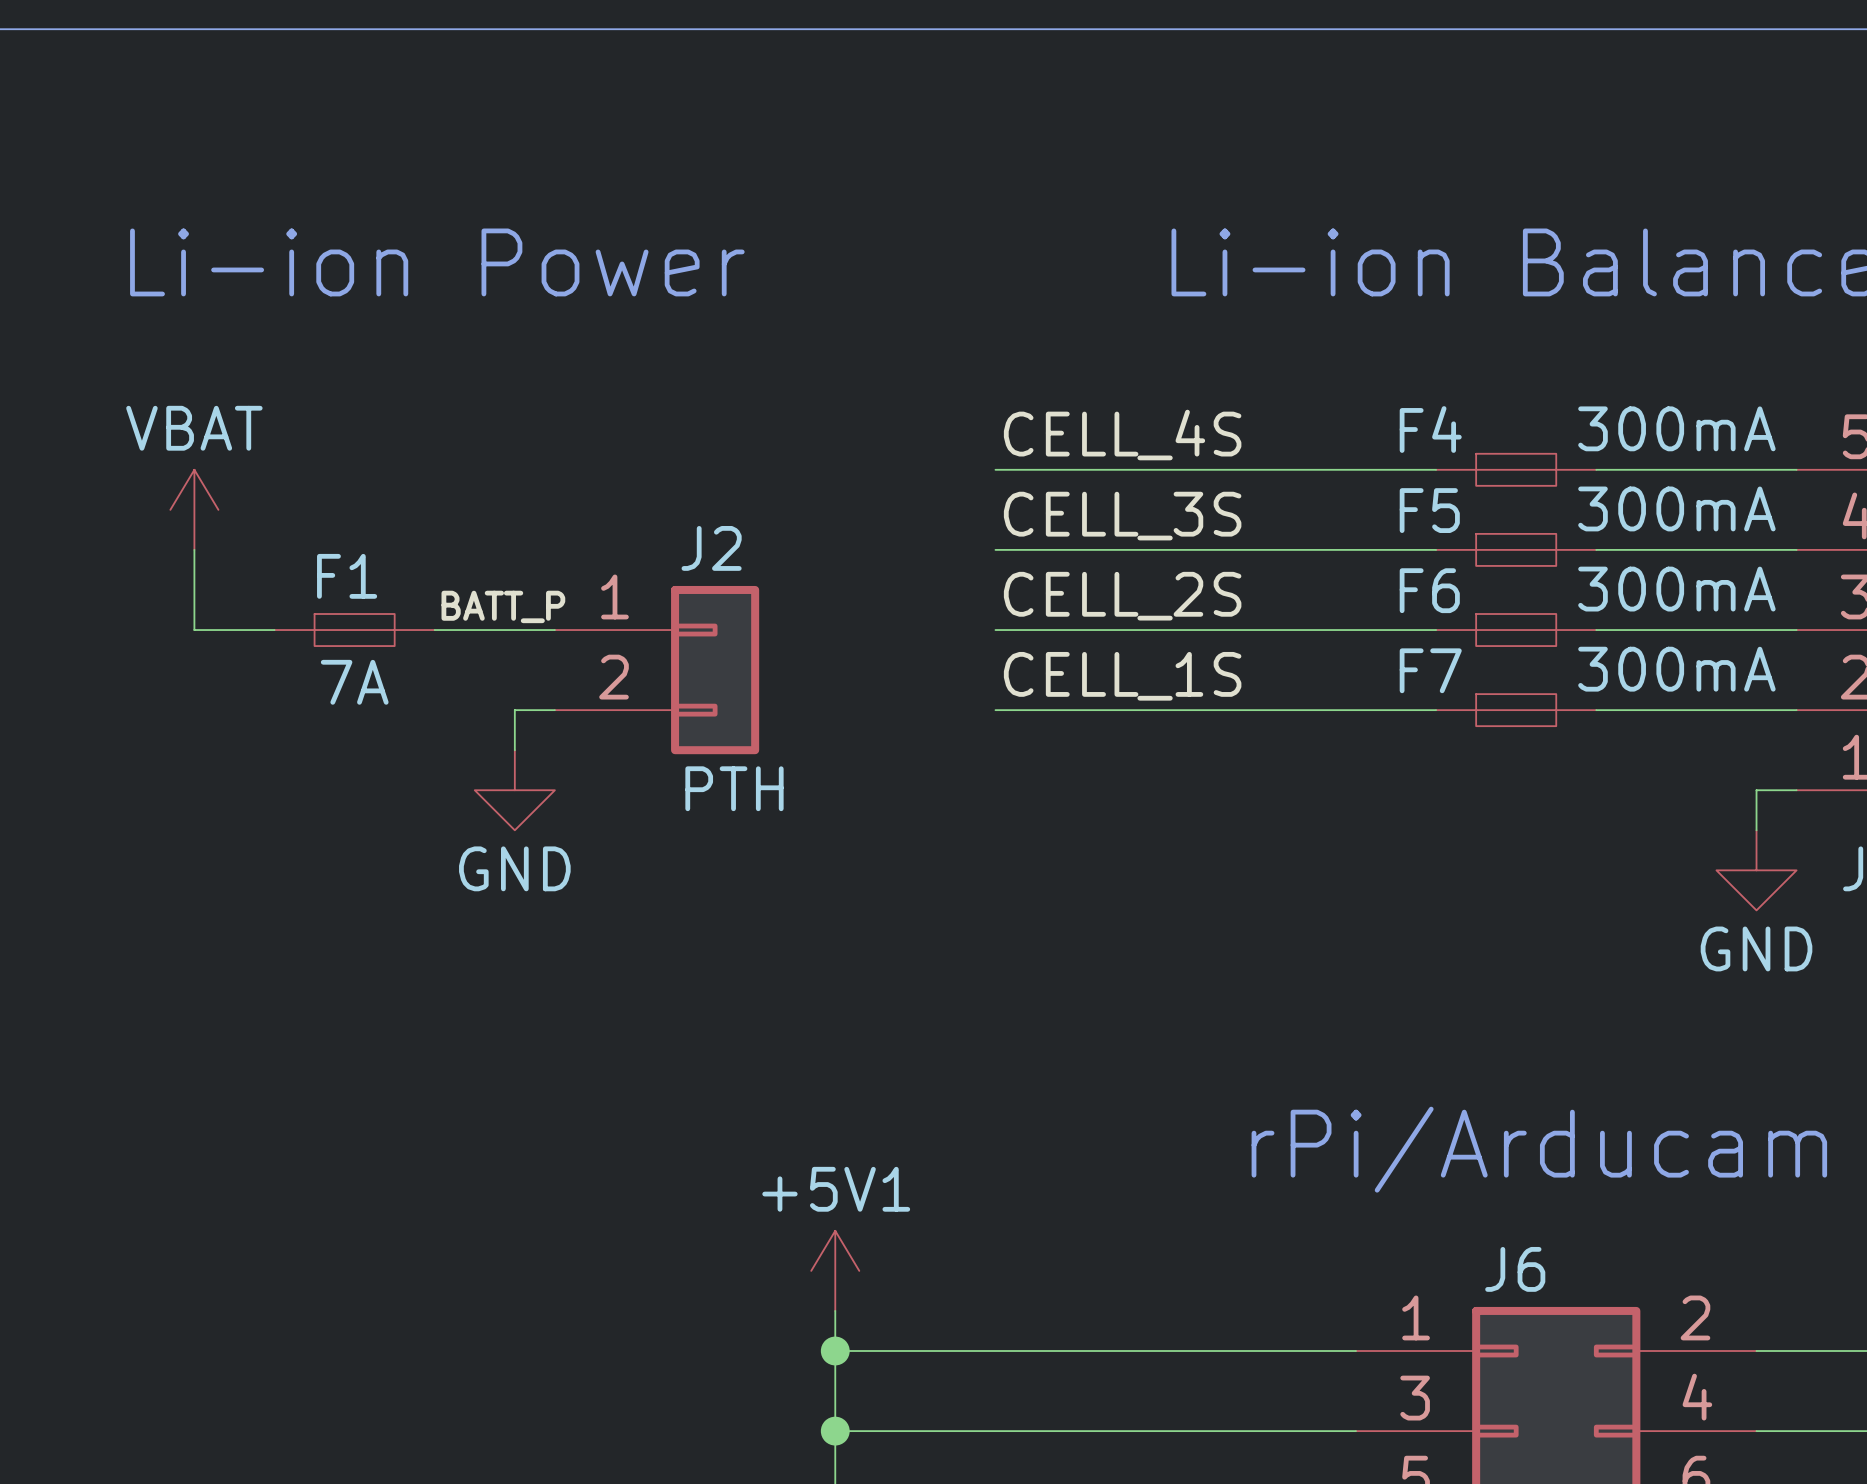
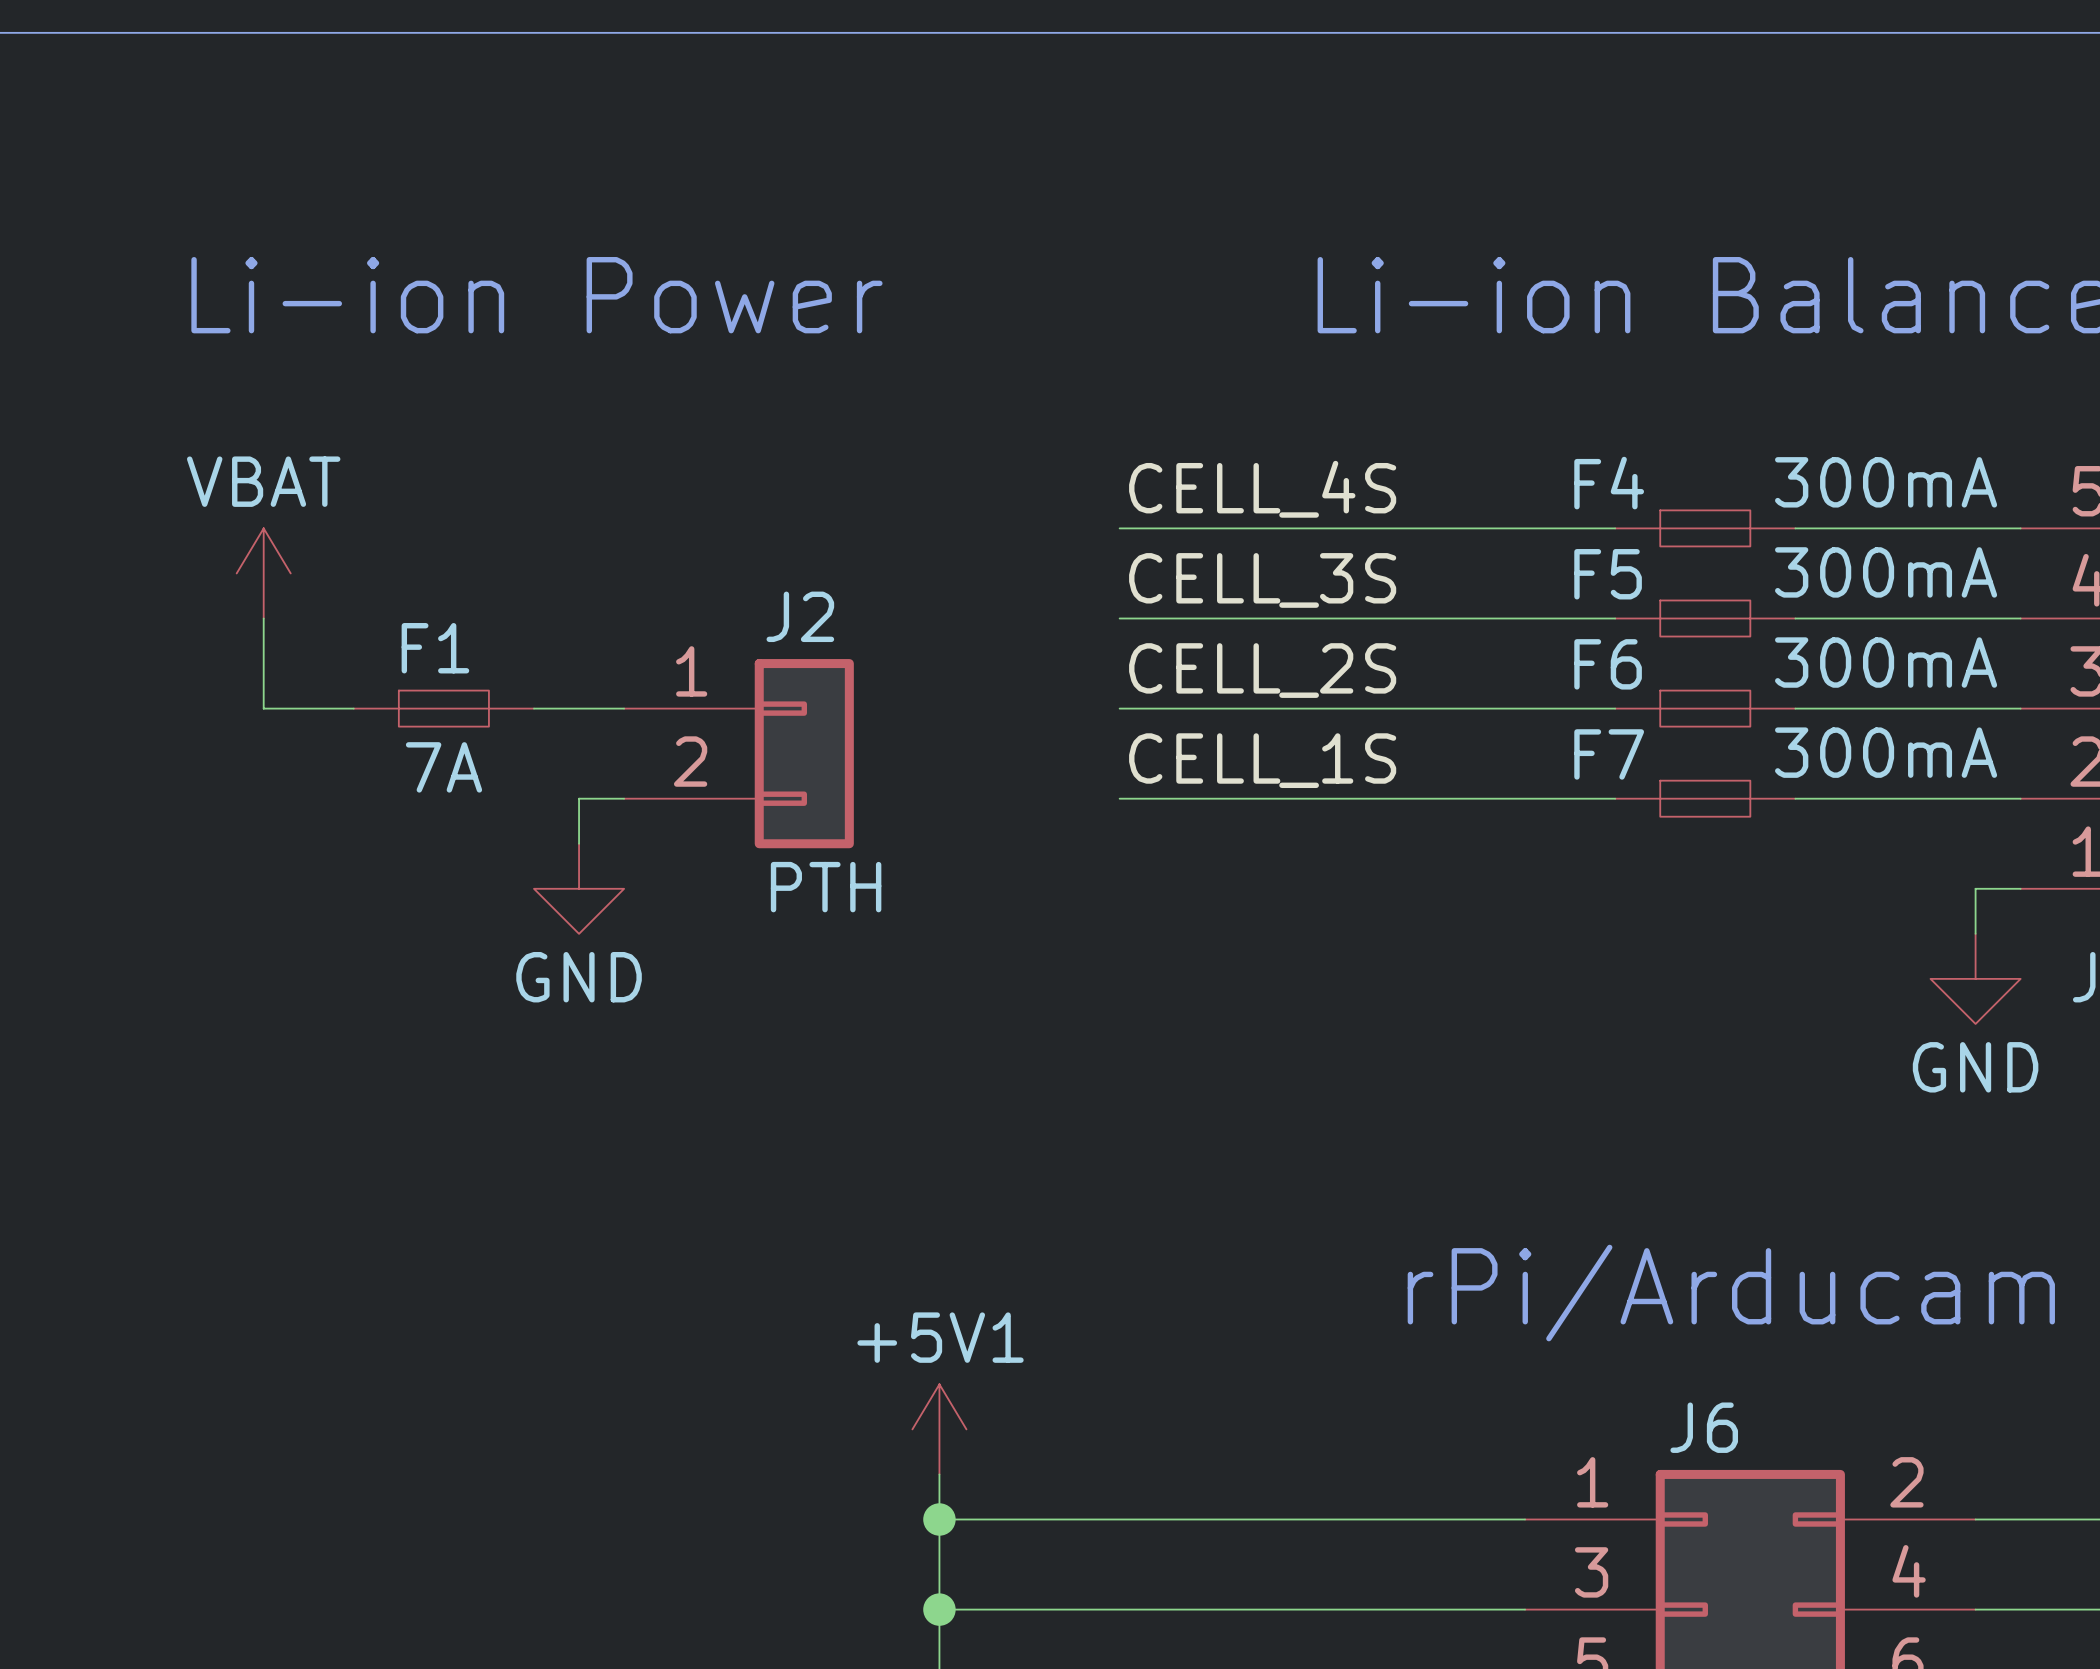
text position: Li-ion Power (437, 262) -> Li-ion Power (536, 295)
power symbol position: VBAT (194, 509) -> VBAT (263, 573)
wire: (194, 549) (194, 630) (234, 630) -> (263, 618) (263, 708)
label: BATT_P (503, 606) -> none
F1 position: (354, 630) -> (443, 708)

